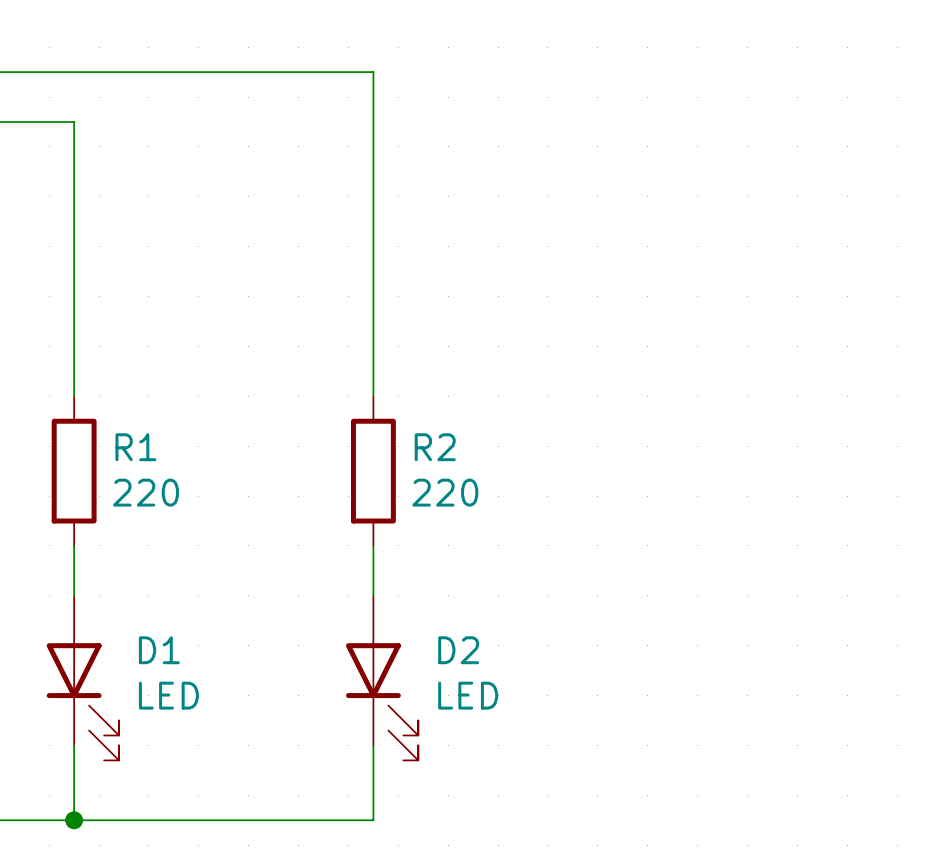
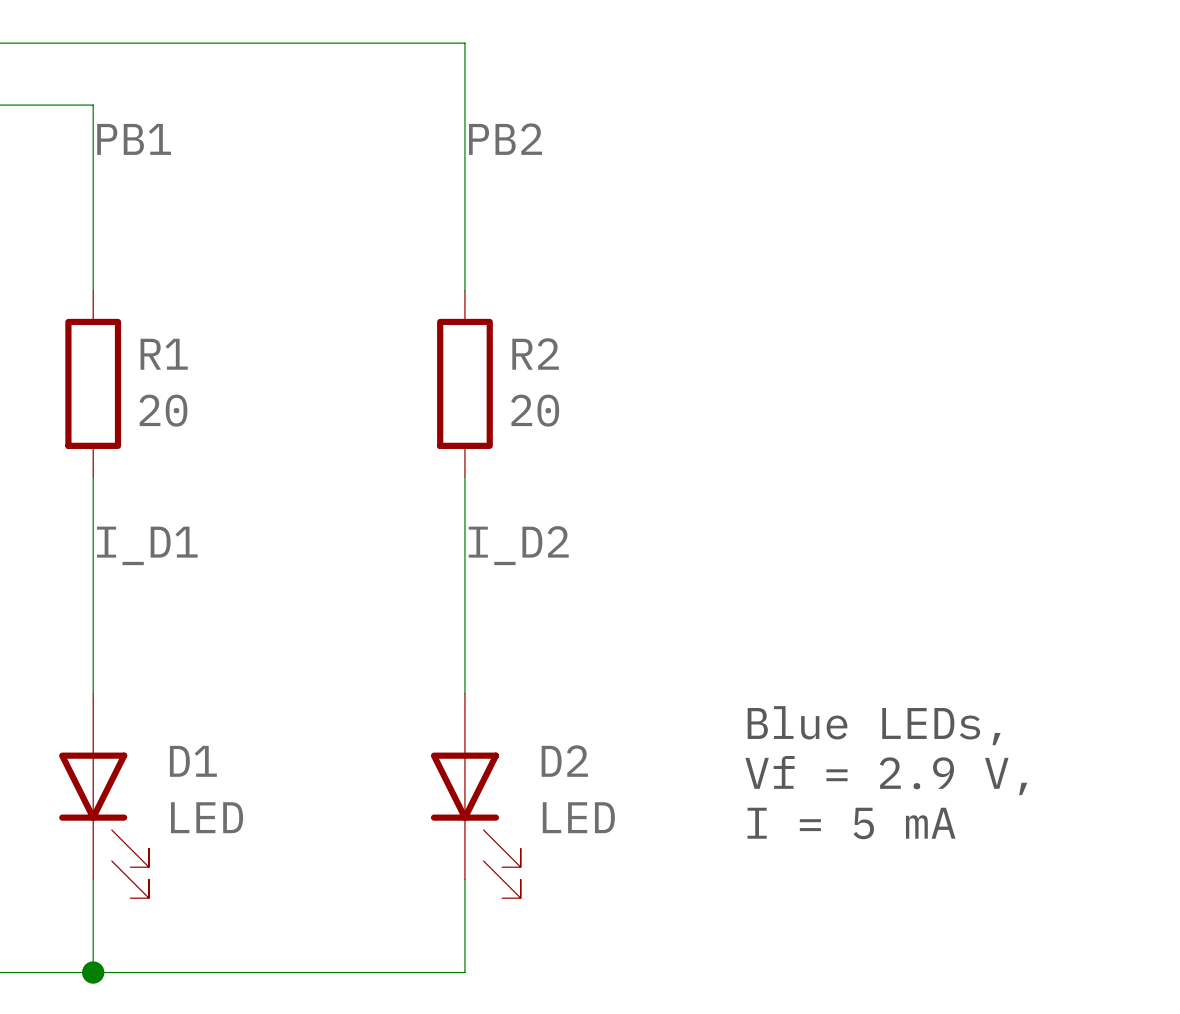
label: none -> PB1 (134, 139)
label: none -> PB2 (505, 139)
wire: (74, 271) (74, 396) -> (93, 476) (93, 631)
wire: (373, 271) (373, 396) -> (464, 476) (464, 631)
R1 position: (74, 471) -> (93, 383)
R2 position: (373, 471) -> (464, 383)
label: none -> I_D1 (147, 545)
label: none -> I_D2 (518, 545)
R1 value: 220 (146, 492) -> 20 (163, 410)
R2 value: 220 (445, 492) -> 20 (535, 410)
text: none -> Blue LEDs, (874, 725)
text: none -> Vf = 2.9 V, (886, 775)
text: none -> I = 5 mA (851, 823)

